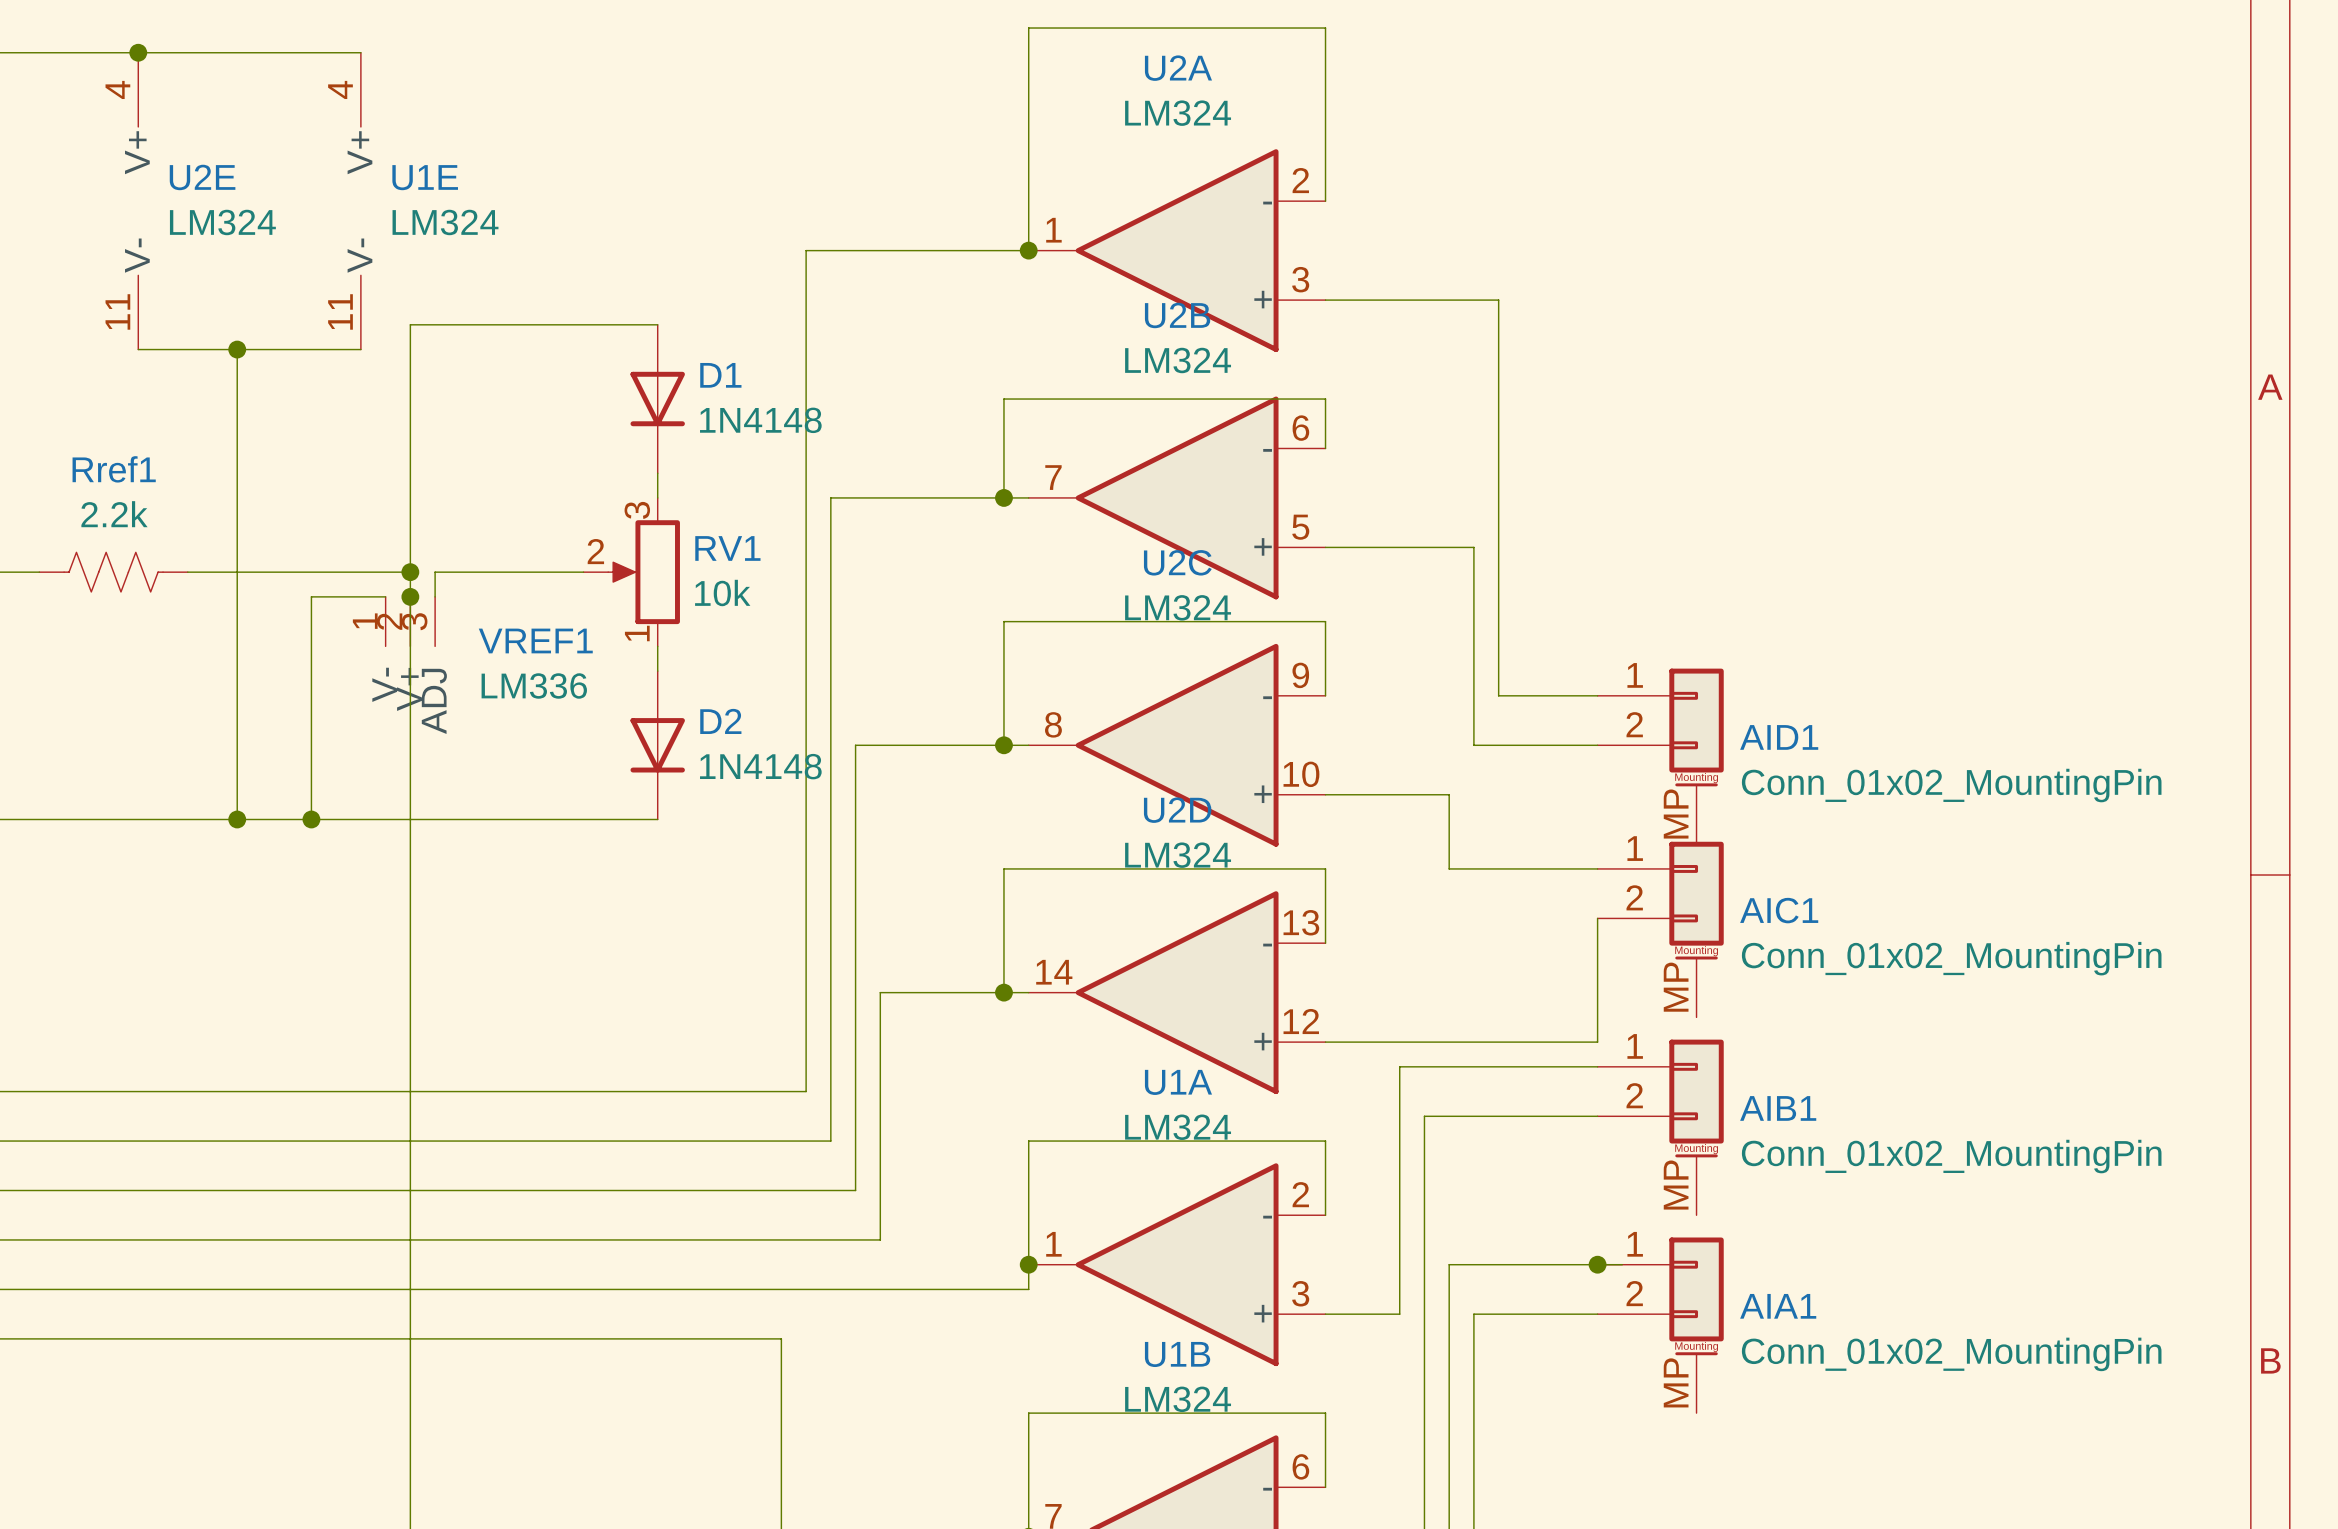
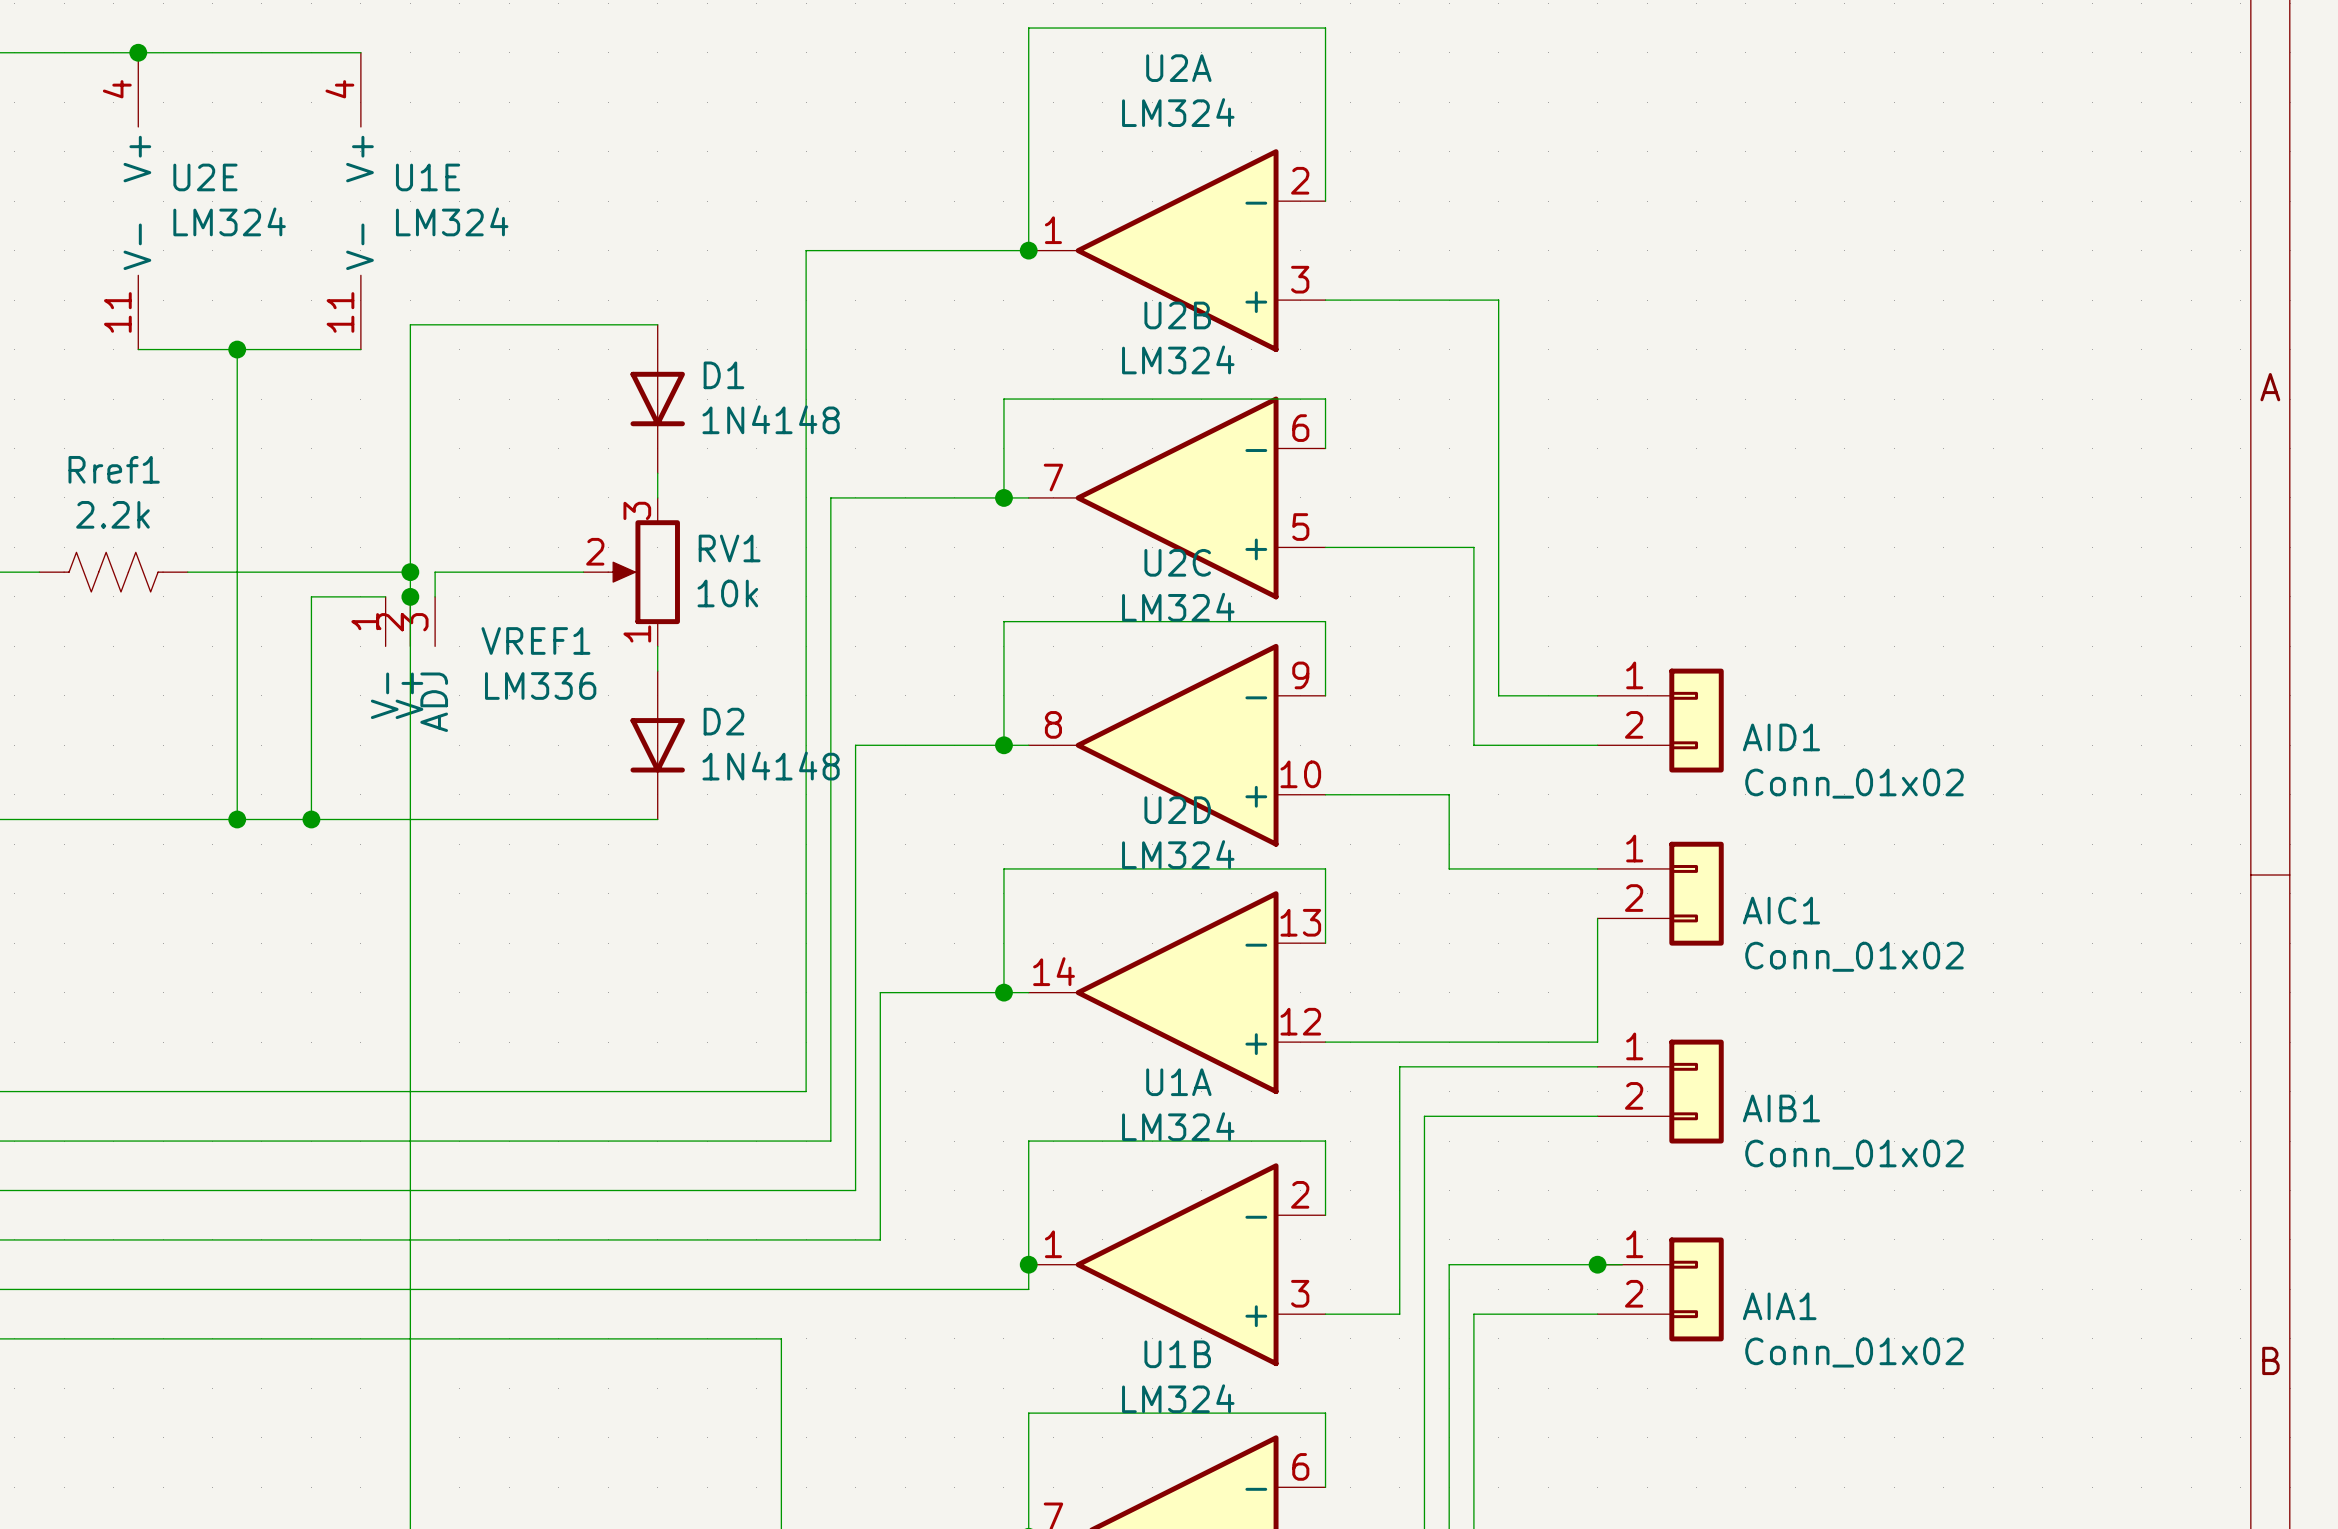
AID1 symbol: [1597, 668, 1724, 845] -> [1597, 668, 1724, 773]
AID1 value: Conn_01x02_MountingPin (1951, 785) -> Conn_01x02 (1854, 783)
AIC1 symbol: [1597, 841, 1724, 1018] -> [1597, 841, 1724, 946]
AIC1 value: Conn_01x02_MountingPin (1951, 958) -> Conn_01x02 (1854, 956)
AIB1 symbol: [1597, 1039, 1724, 1216] -> [1597, 1039, 1724, 1144]
AIB1 value: Conn_01x02_MountingPin (1951, 1156) -> Conn_01x02 (1854, 1154)
AIA1 symbol: [1597, 1237, 1724, 1414] -> [1597, 1237, 1724, 1342]
AIA1 value: Conn_01x02_MountingPin (1951, 1354) -> Conn_01x02 (1854, 1352)

